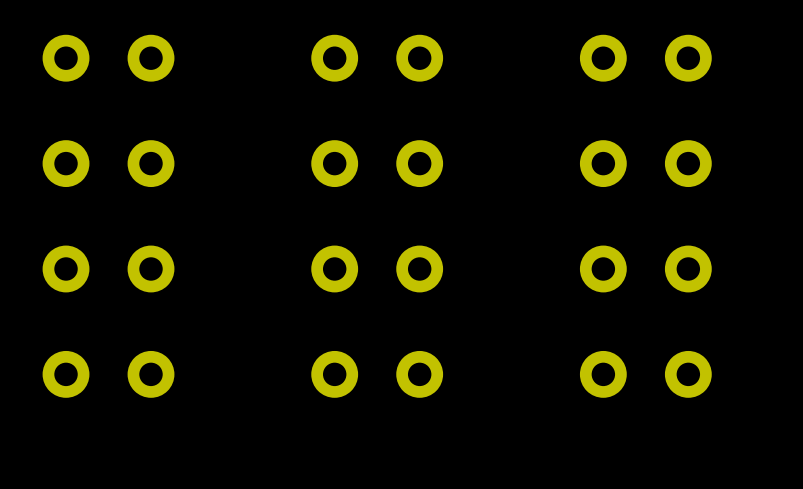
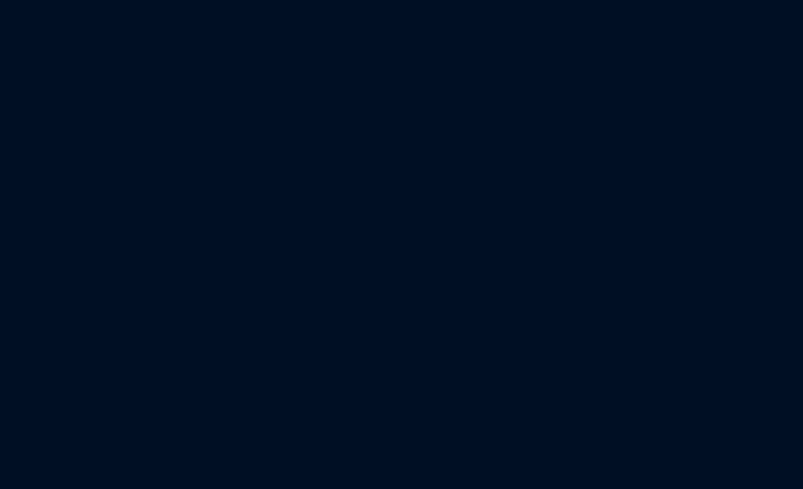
part: (108, 58) -> none
part: (377, 58) -> none
part: (645, 58) -> none
part: (108, 163) -> none
part: (377, 163) -> none
part: (645, 163) -> none
part: (108, 268) -> none
part: (377, 268) -> none
part: (645, 268) -> none
part: (108, 374) -> none
part: (377, 374) -> none
part: (645, 374) -> none

